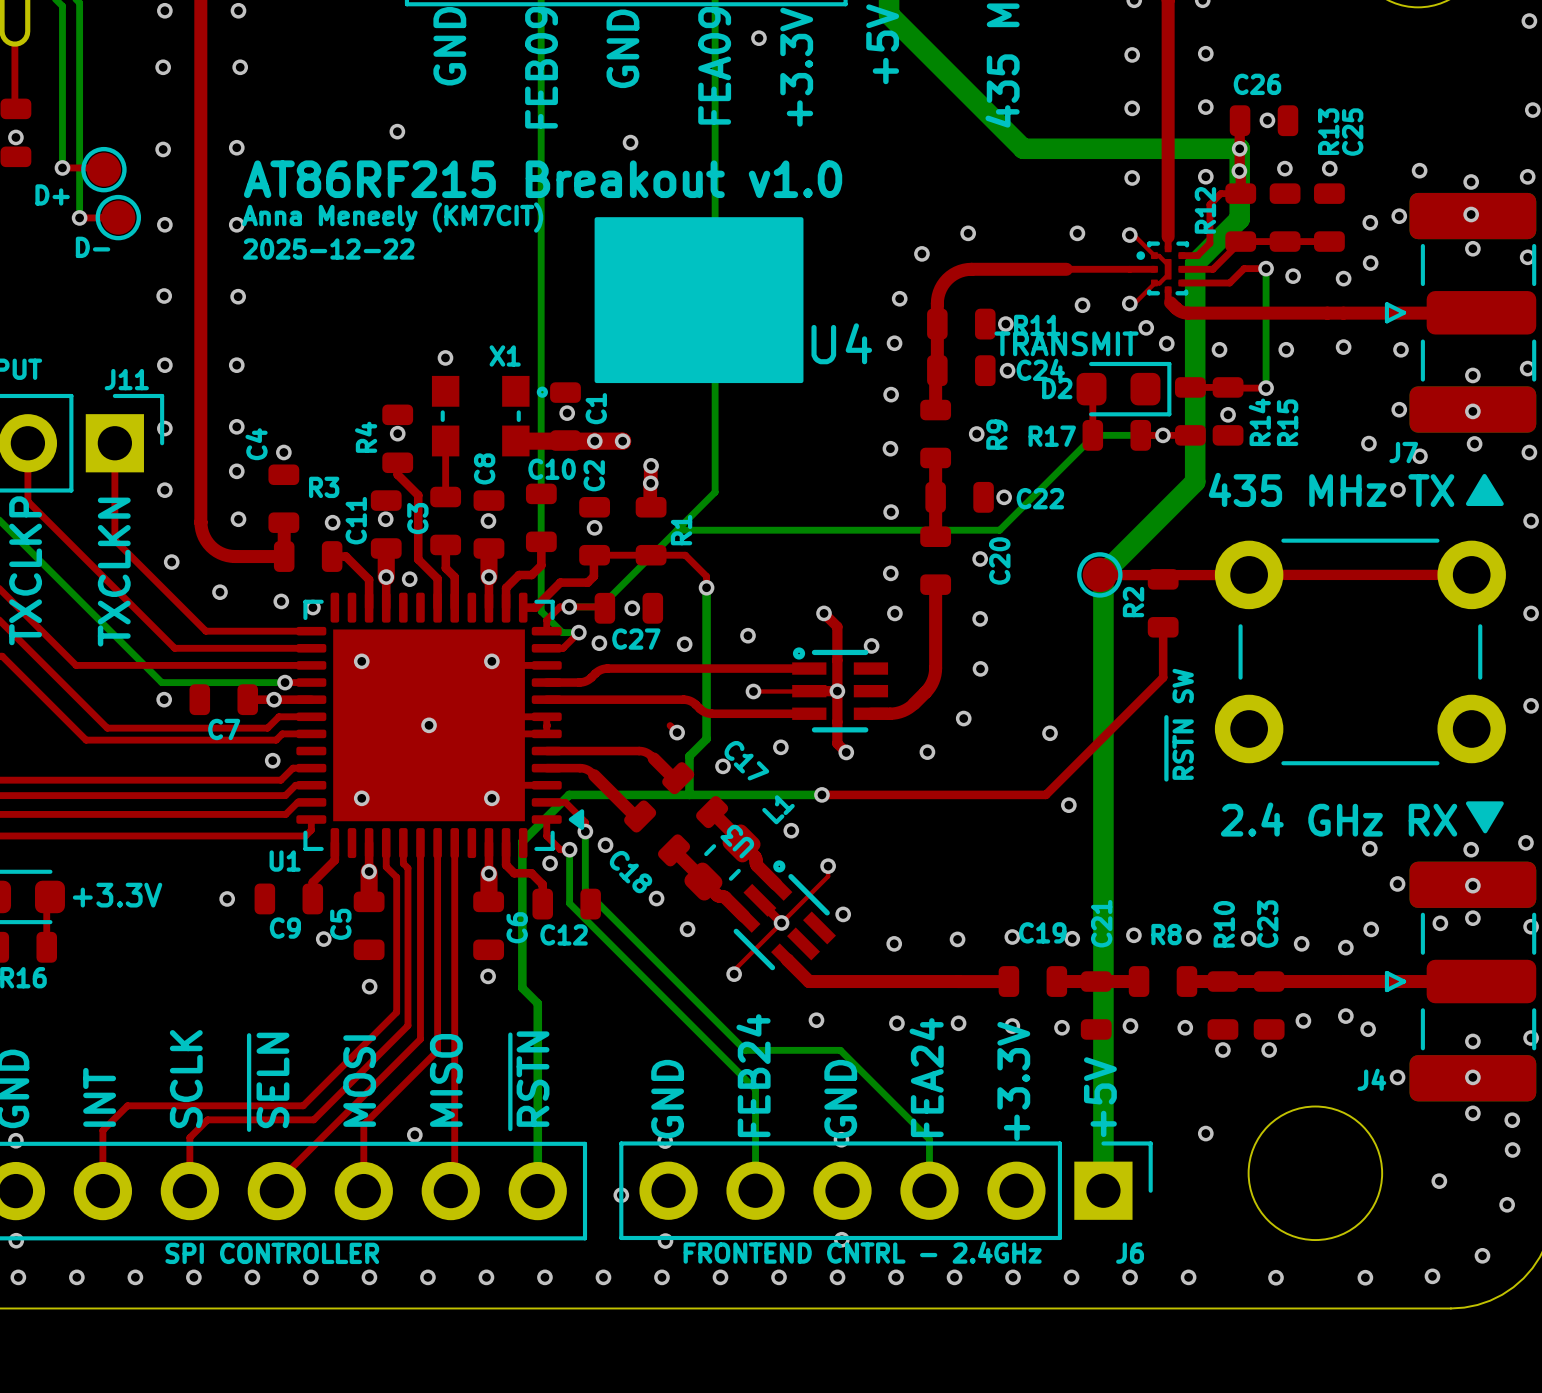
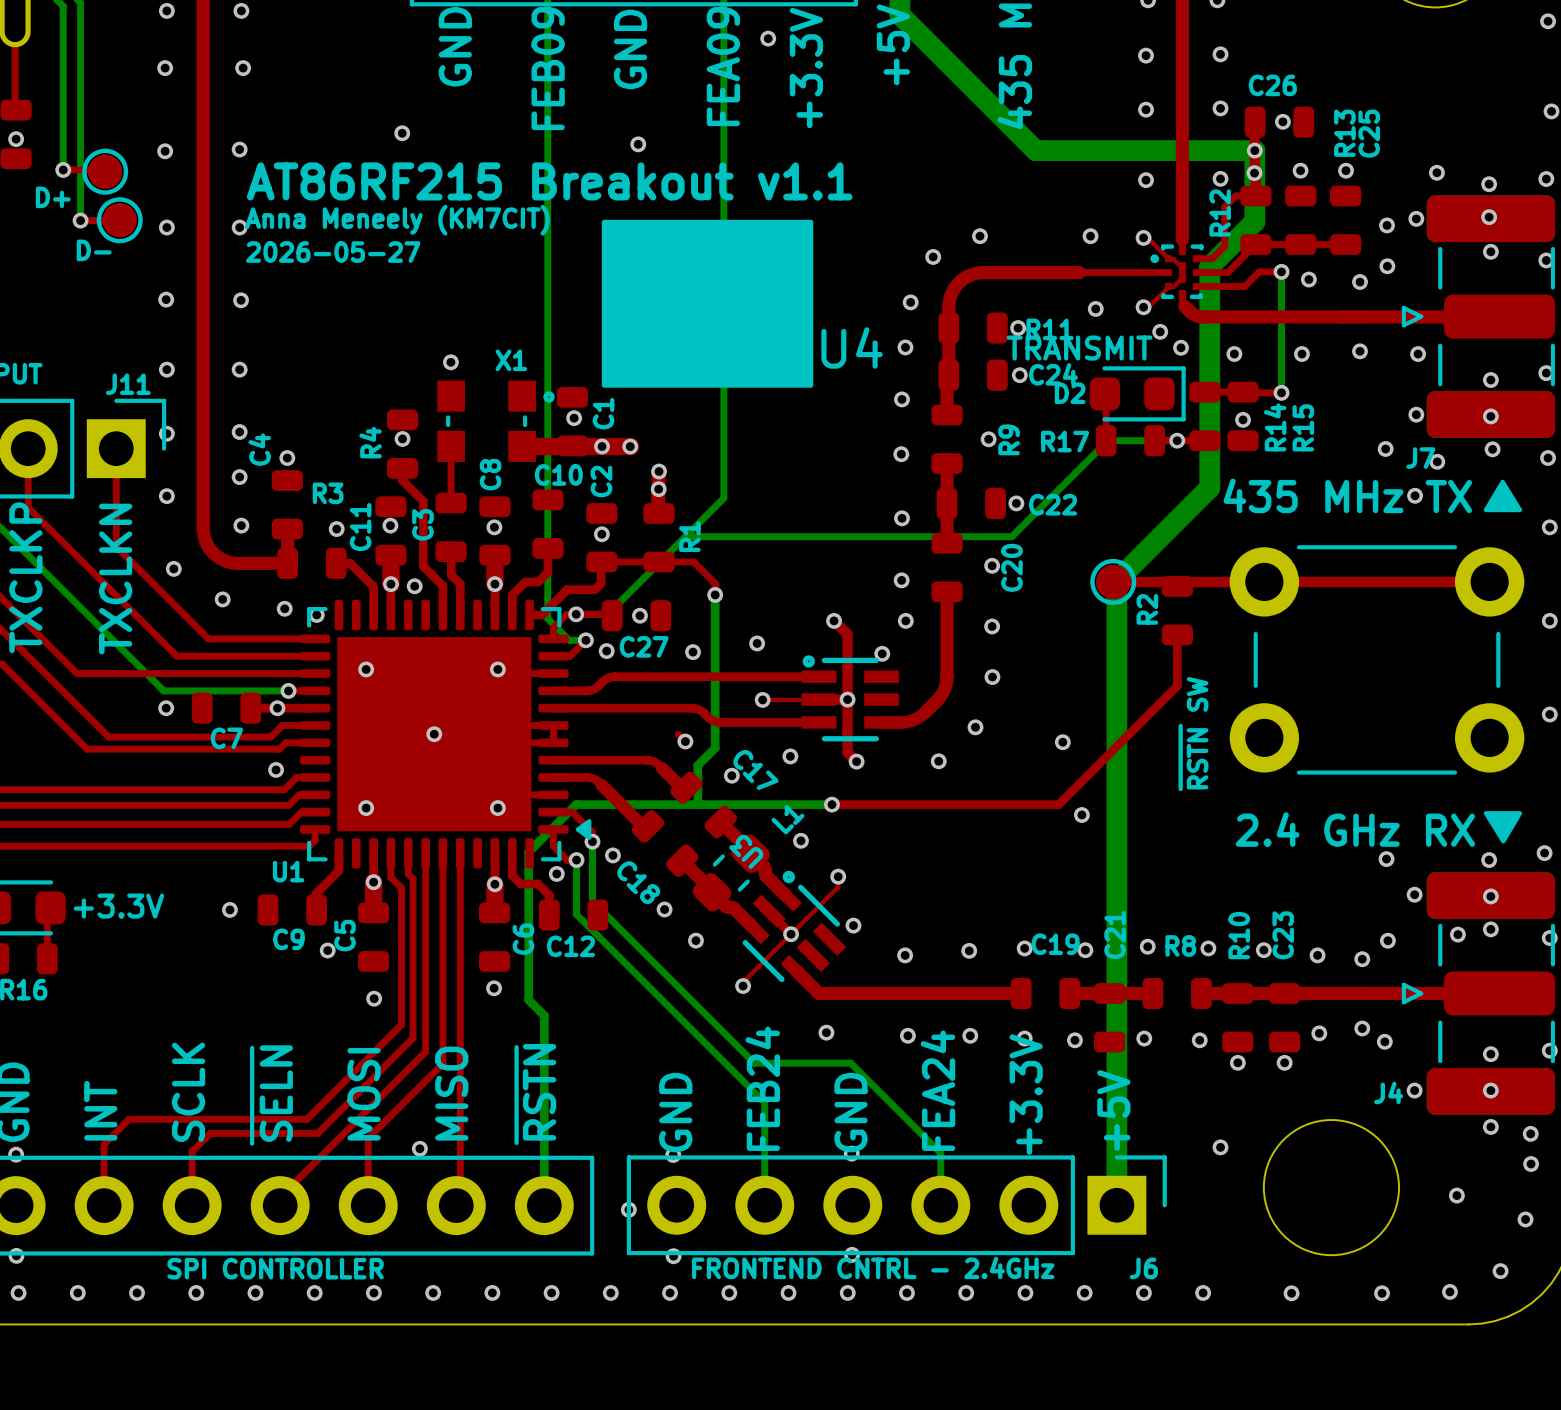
text: AT86RF215 Breakout v1.0 (543, 179) -> AT86RF215 Breakout v1.1 (549, 181)
text: 2025-12-22 (328, 248) -> 2026-05-27 (333, 252)

